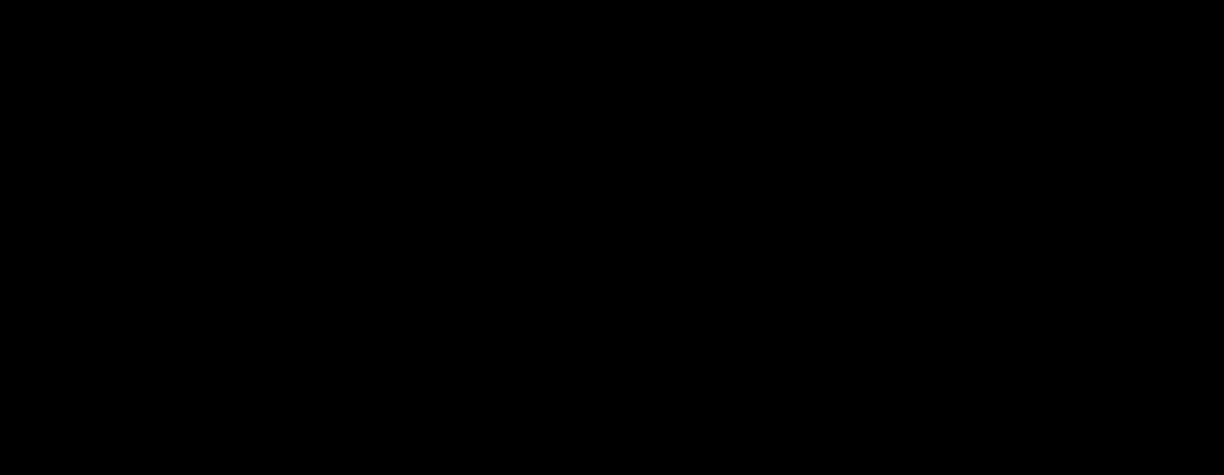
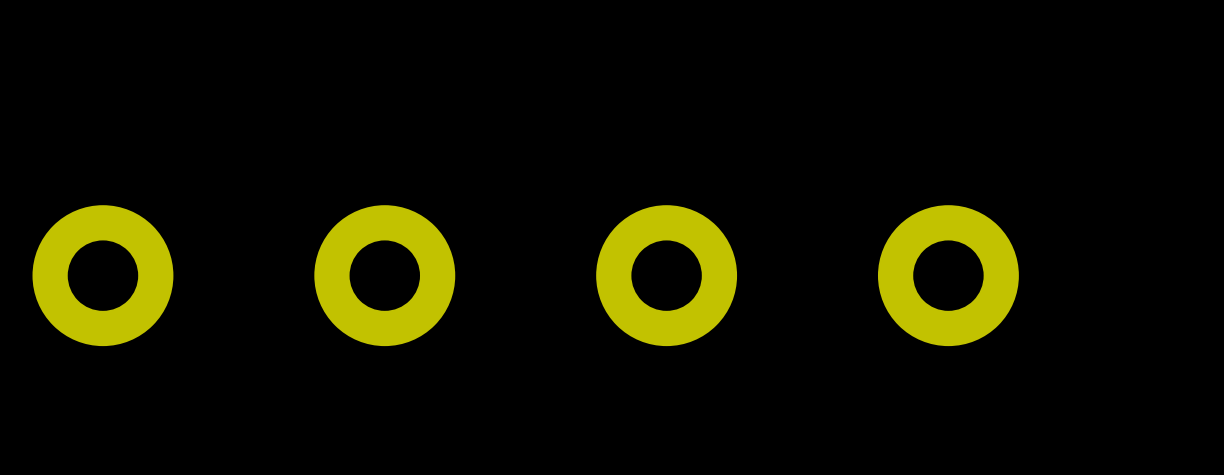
part: none -> (102, 275)
part: none -> (384, 275)
part: none -> (666, 275)
part: none -> (948, 275)

